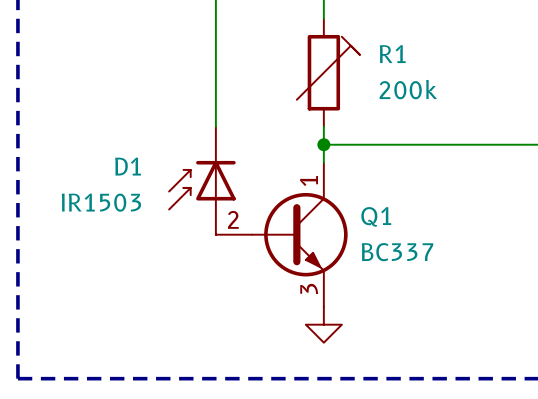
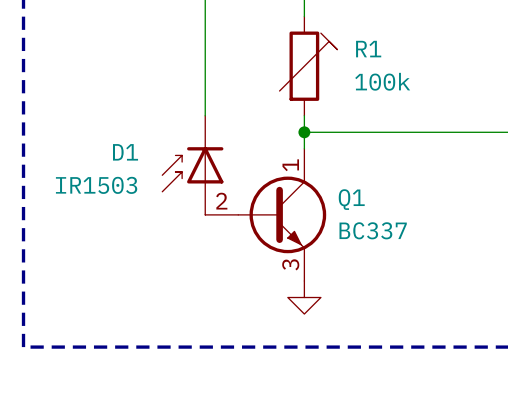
R1 value: 200k (408, 89) -> 100k (382, 81)

